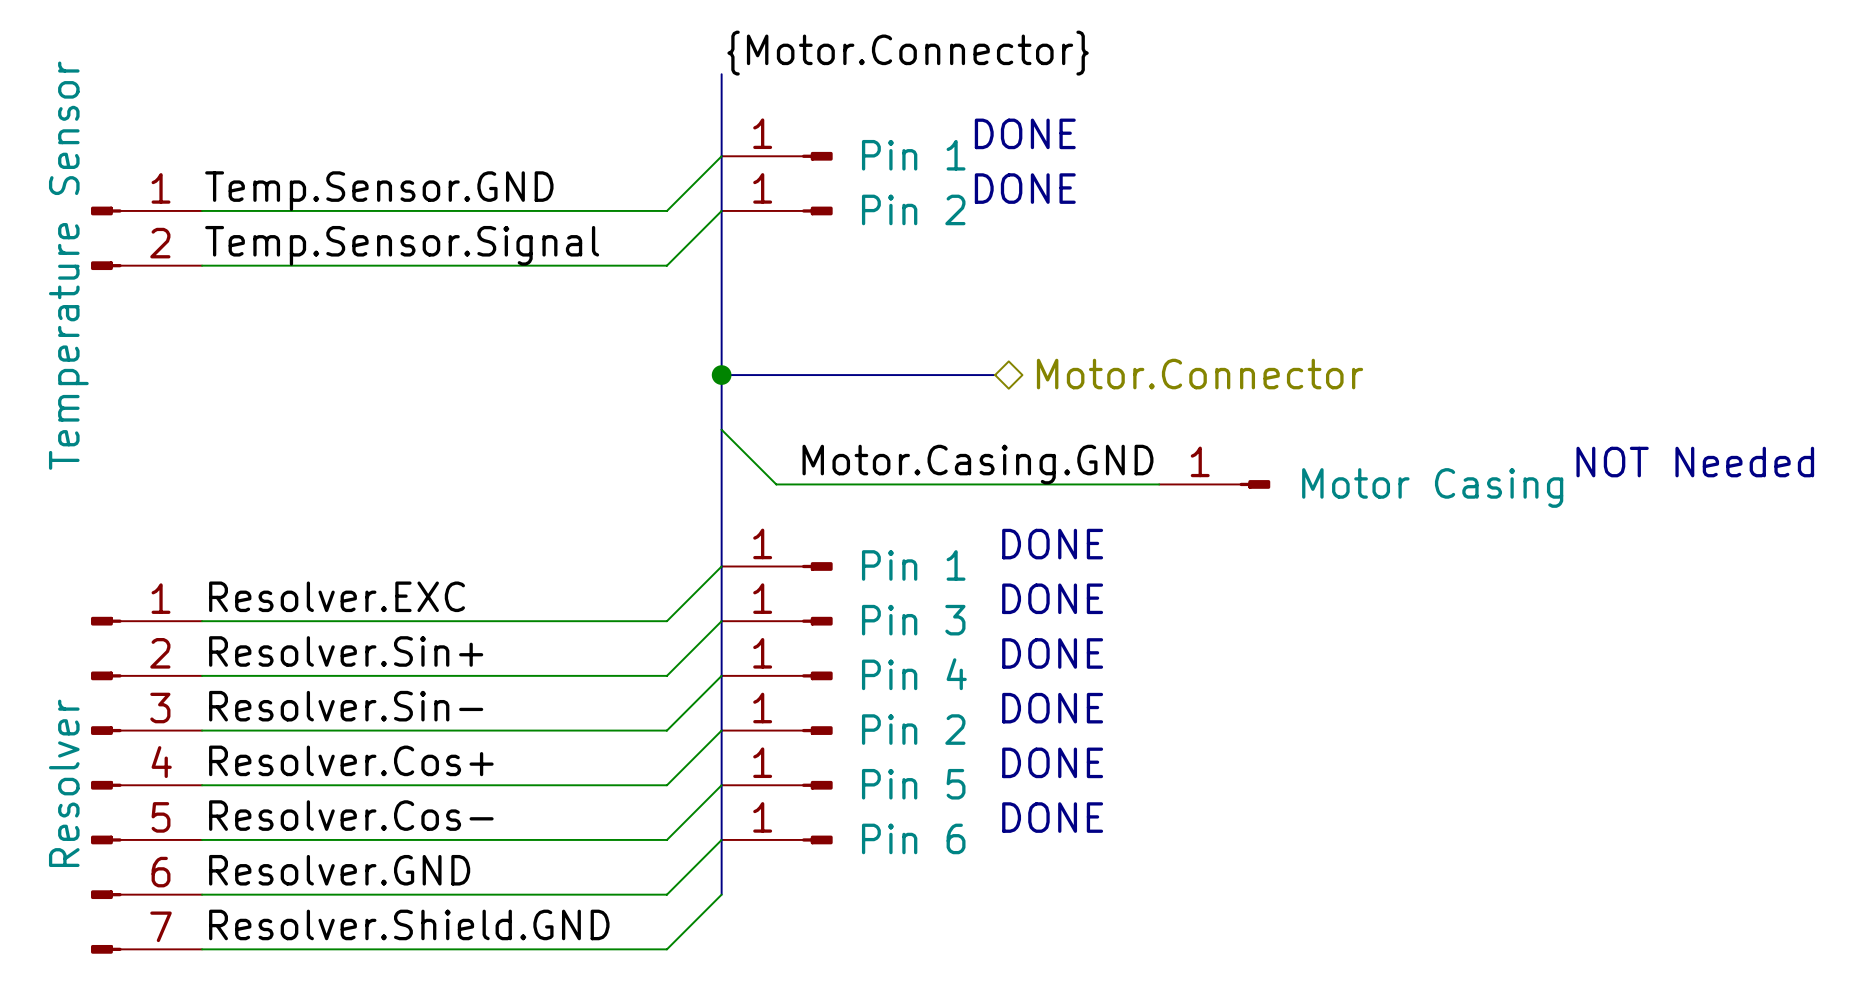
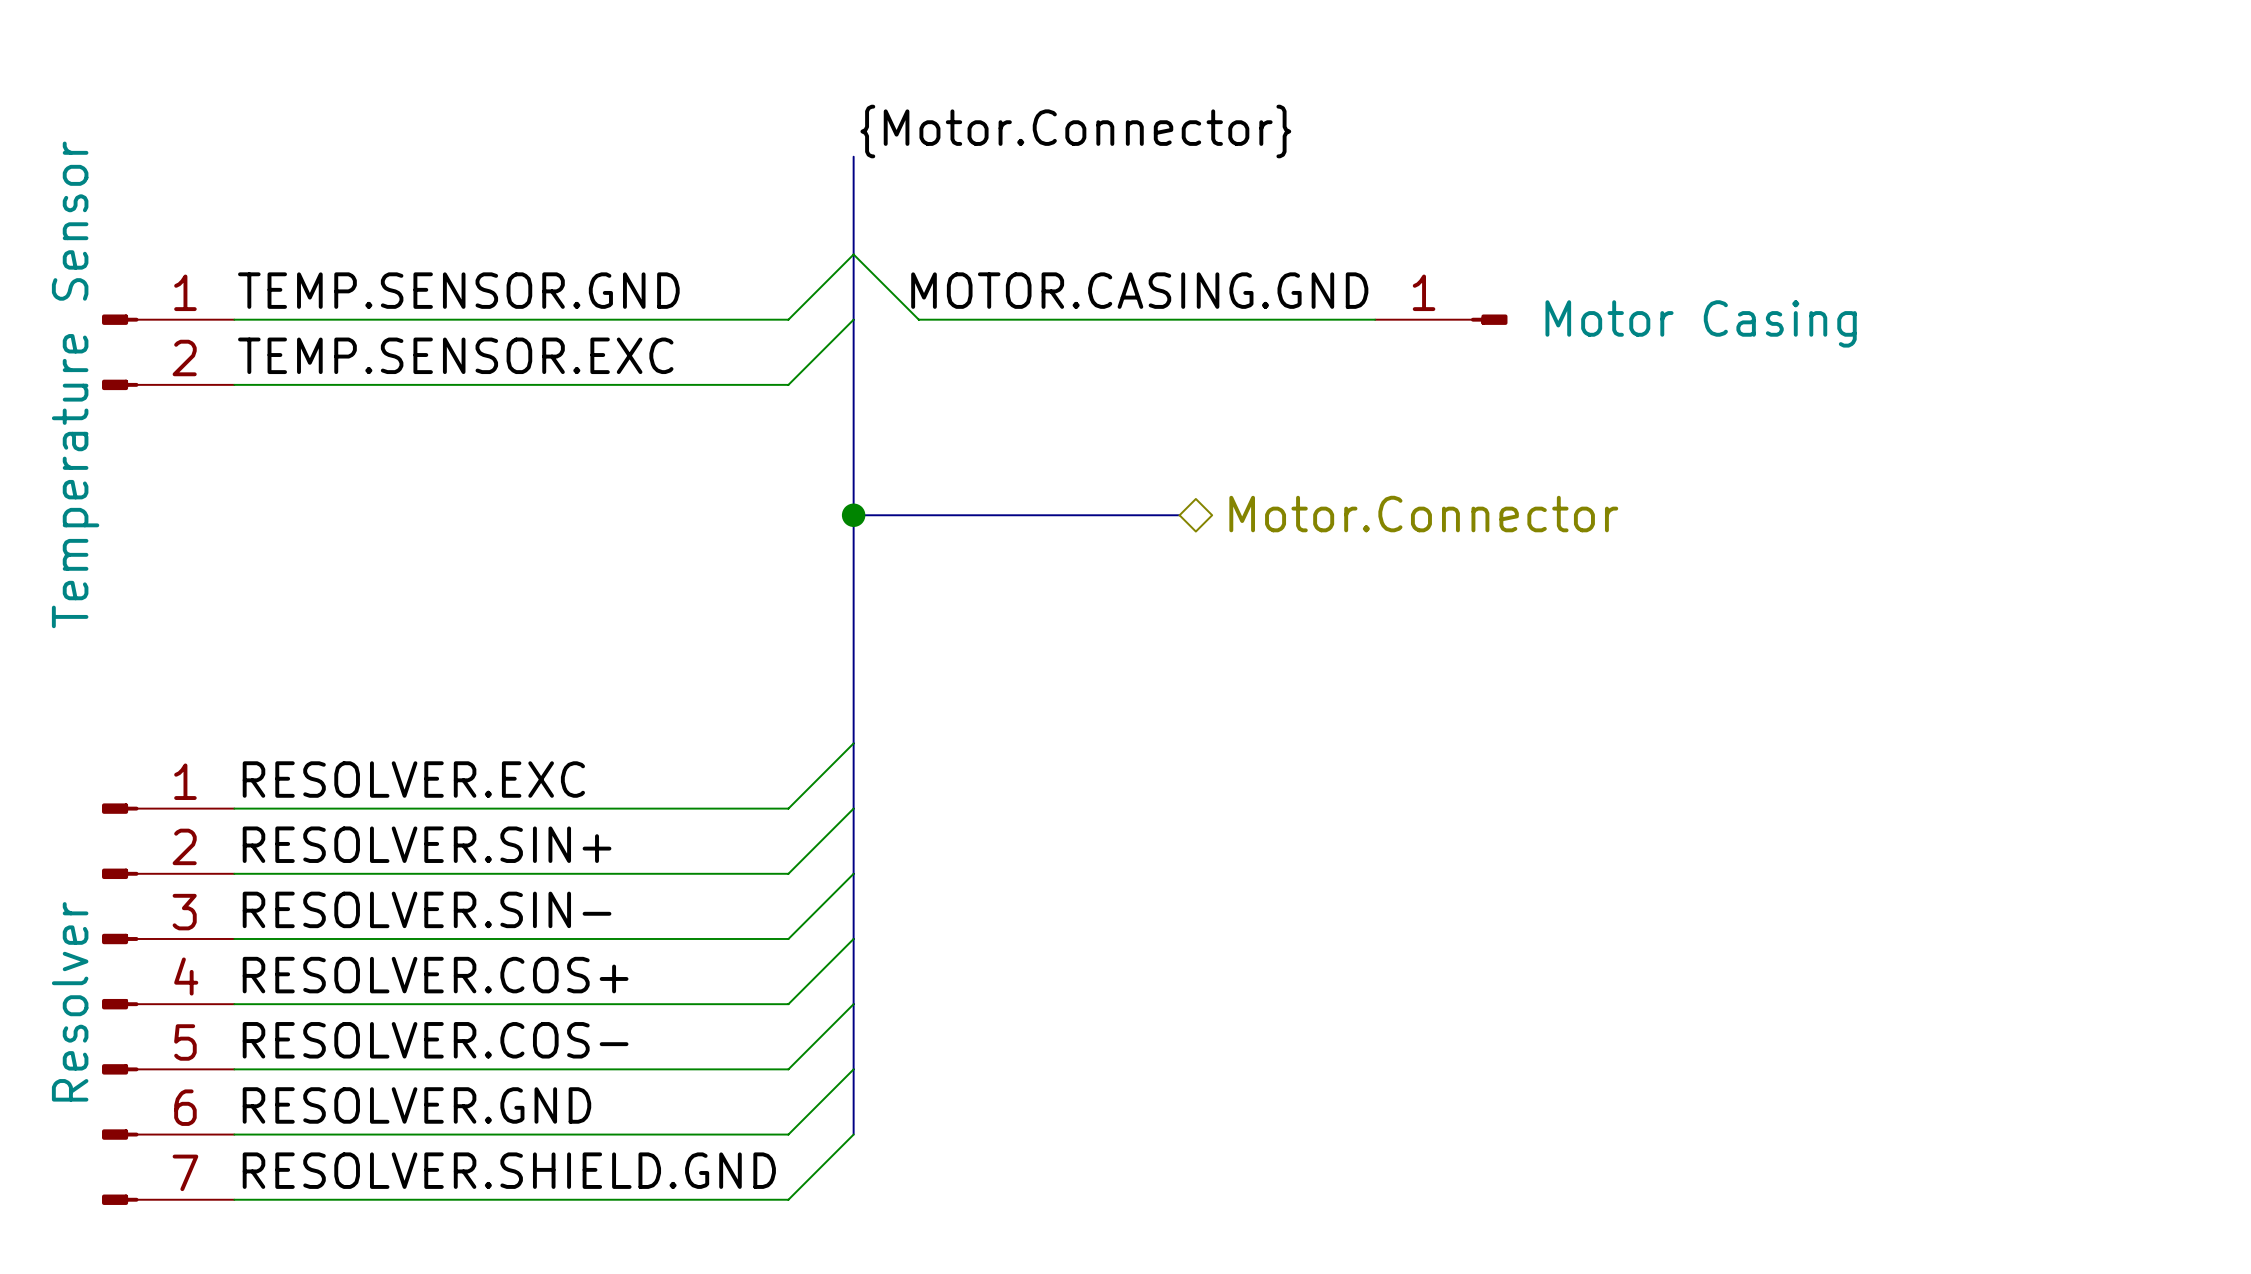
text: DONE (1025, 133) -> none
part: Pin 1 (777, 156) -> none
label: none -> MOTOR.CASING.GND (1139, 290)
text: DONE (1025, 188) -> none
label: Temp.Sensor.GND (379, 191) -> TEMP.SENSOR.GND (458, 290)
part: Pin 2 (777, 210) -> none
label: Temp.Sensor.Signal (402, 245) -> TEMP.SENSOR.EXC (455, 355)
wire: (721, 429) (776, 484) (1159, 484) -> (853, 254) (918, 319) (1375, 319)
text: NOT Needed (1695, 462) -> none
label: Motor.Casing.GND (977, 464) -> none
part position: (1214, 484) -> (1441, 319)
text: DONE (1052, 544) -> none
part: Pin 1 (777, 566) -> none
label: Resolver.EXC (337, 596) -> RESOLVER.EXC (413, 779)
text: DONE (1052, 598) -> none
part: Pin 3 (777, 621) -> none
label: Resolver.Sin+ (346, 651) -> RESOLVER.SIN+ (427, 844)
text: DONE (1052, 653) -> none
part: Pin 4 (777, 675) -> none
label: Resolver.Sin- (346, 706) -> RESOLVER.SIN- (427, 909)
text: DONE (1052, 708) -> none
part: Pin 2 (777, 730) -> none
label: Resolver.Cos+ (351, 760) -> RESOLVER.COS+ (435, 975)
text: DONE (1052, 762) -> none
part: Pin 5 (777, 785) -> none
label: Resolver.Cos- (351, 815) -> RESOLVER.COS- (435, 1040)
text: DONE (1052, 817) -> none
part: Pin 6 (777, 839) -> none
label: Resolver.GND (339, 870) -> RESOLVER.GND (416, 1105)
label: Resolver.Shield.GND (409, 924) -> RESOLVER.SHIELD.GND (509, 1170)

